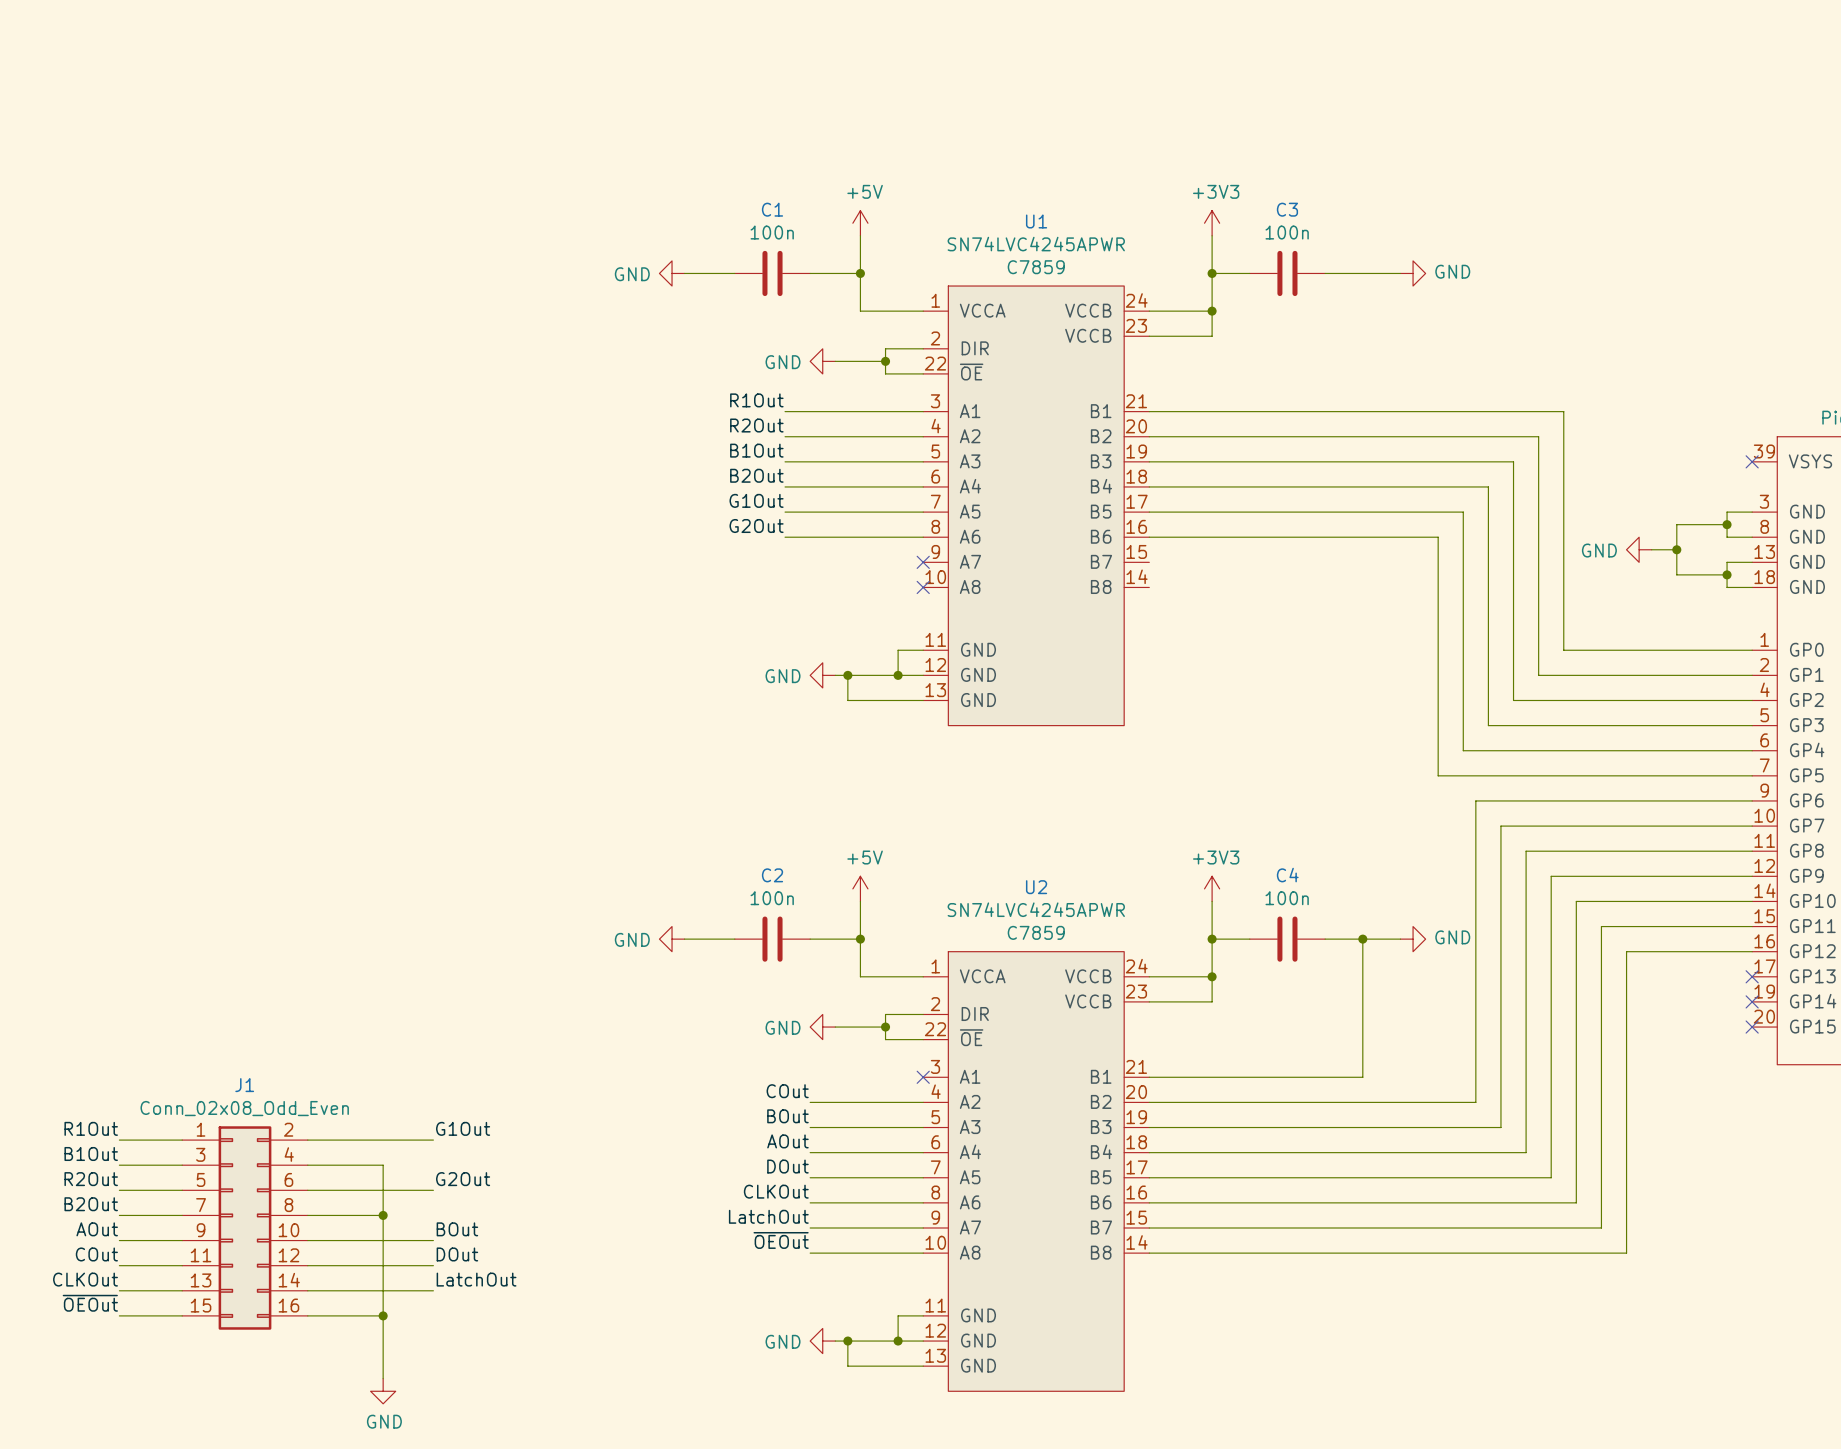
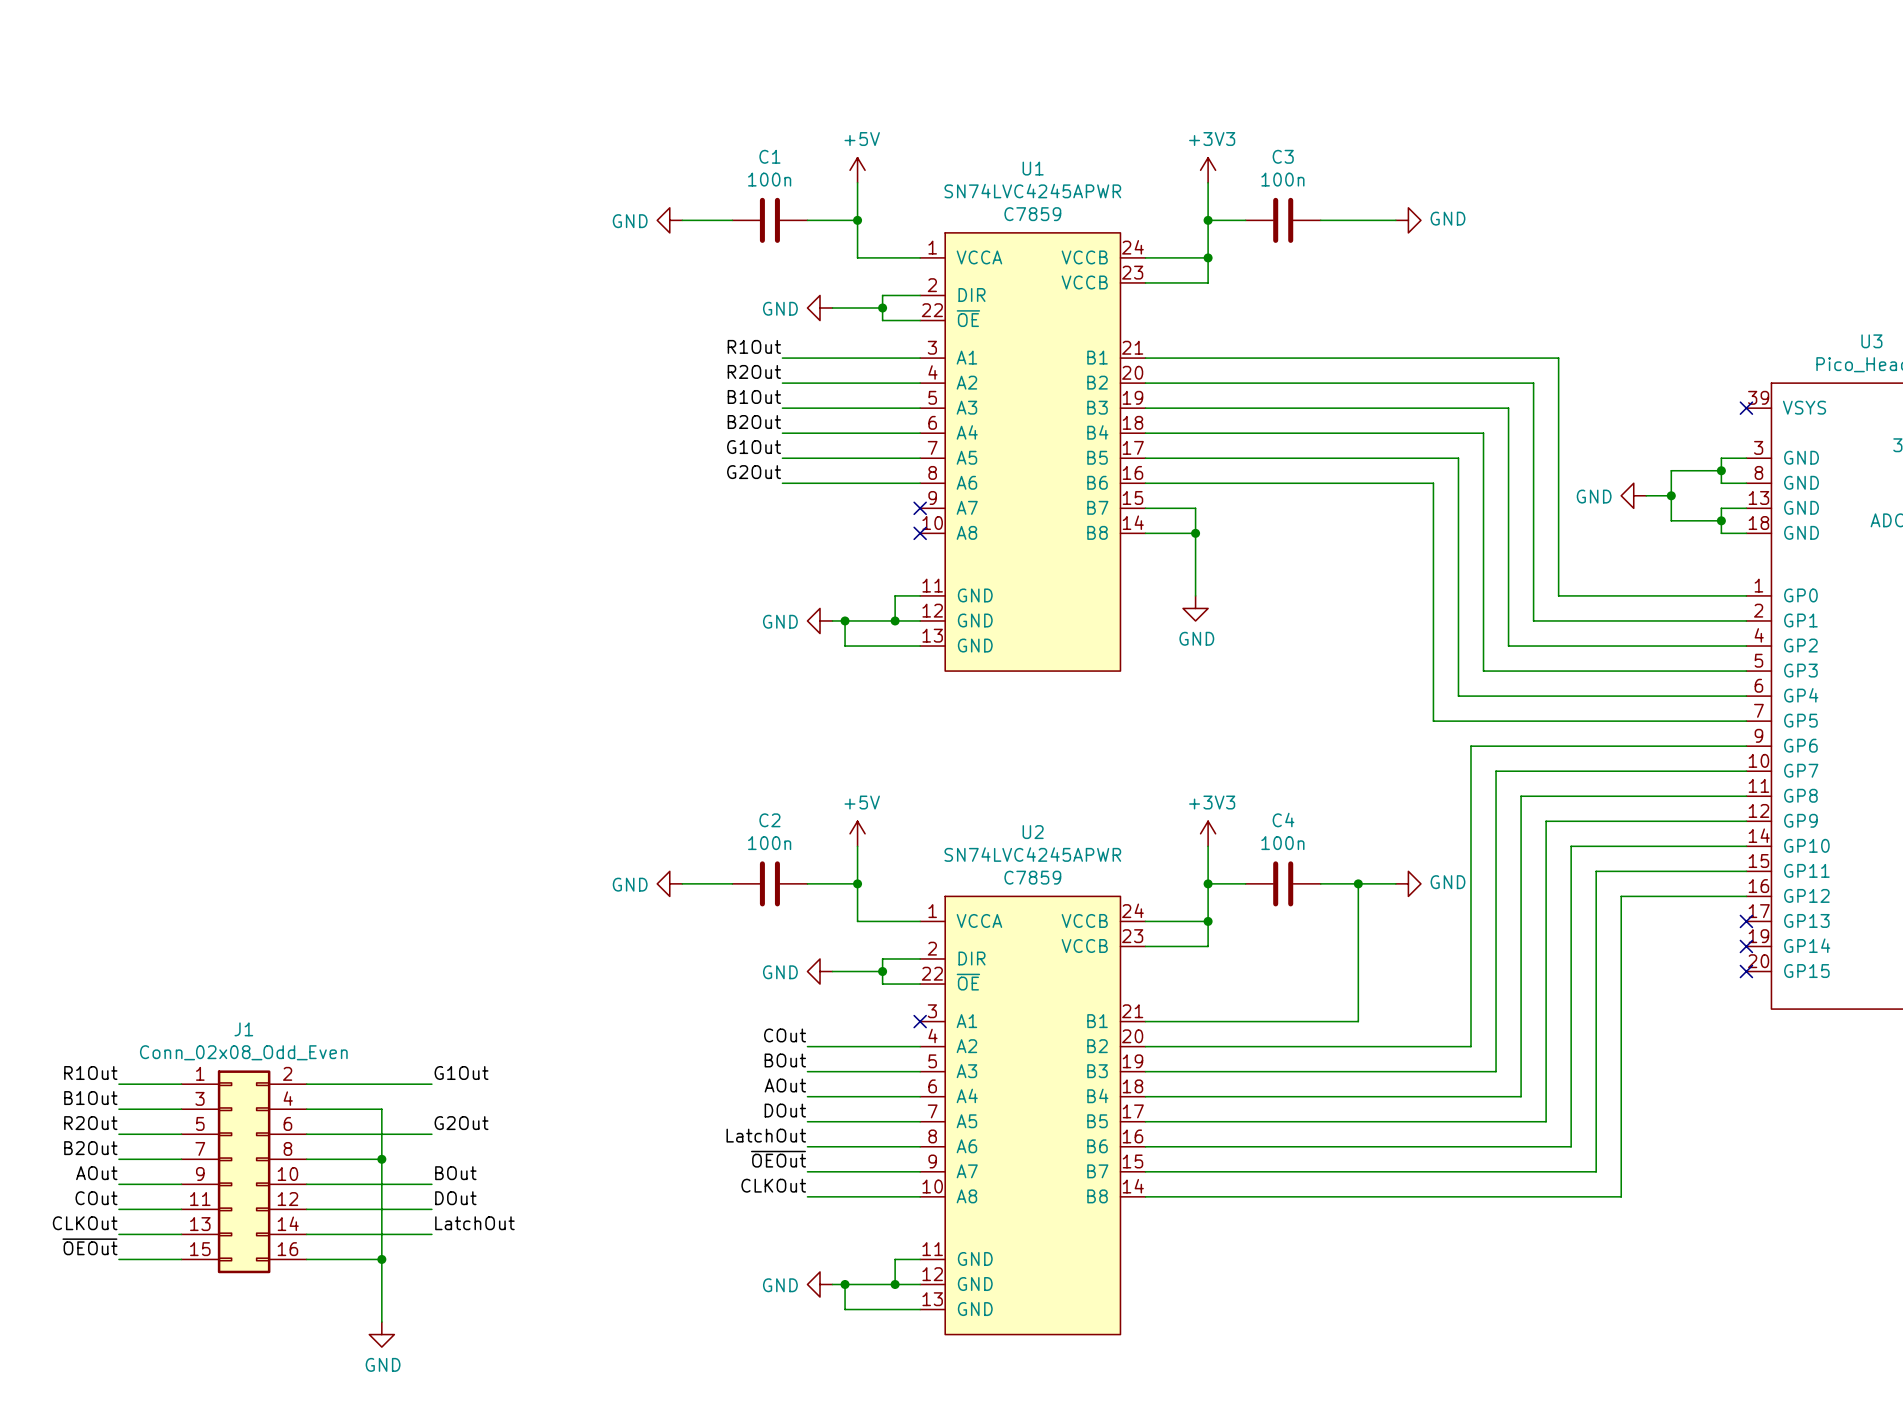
wire: none -> (1145, 508) (1195, 508) (1195, 595)
wire: none -> (1145, 533) (1195, 533)
junction: none -> (1195, 533)
power symbol: none -> GND (1195, 608)
label: CLKOut (776, 1191) -> LatchOut (766, 1135)
label: LatchOut (768, 1216) -> ~{OEOut} (778, 1159)
label: ~{OEOut} (781, 1240) -> CLKOut (773, 1185)

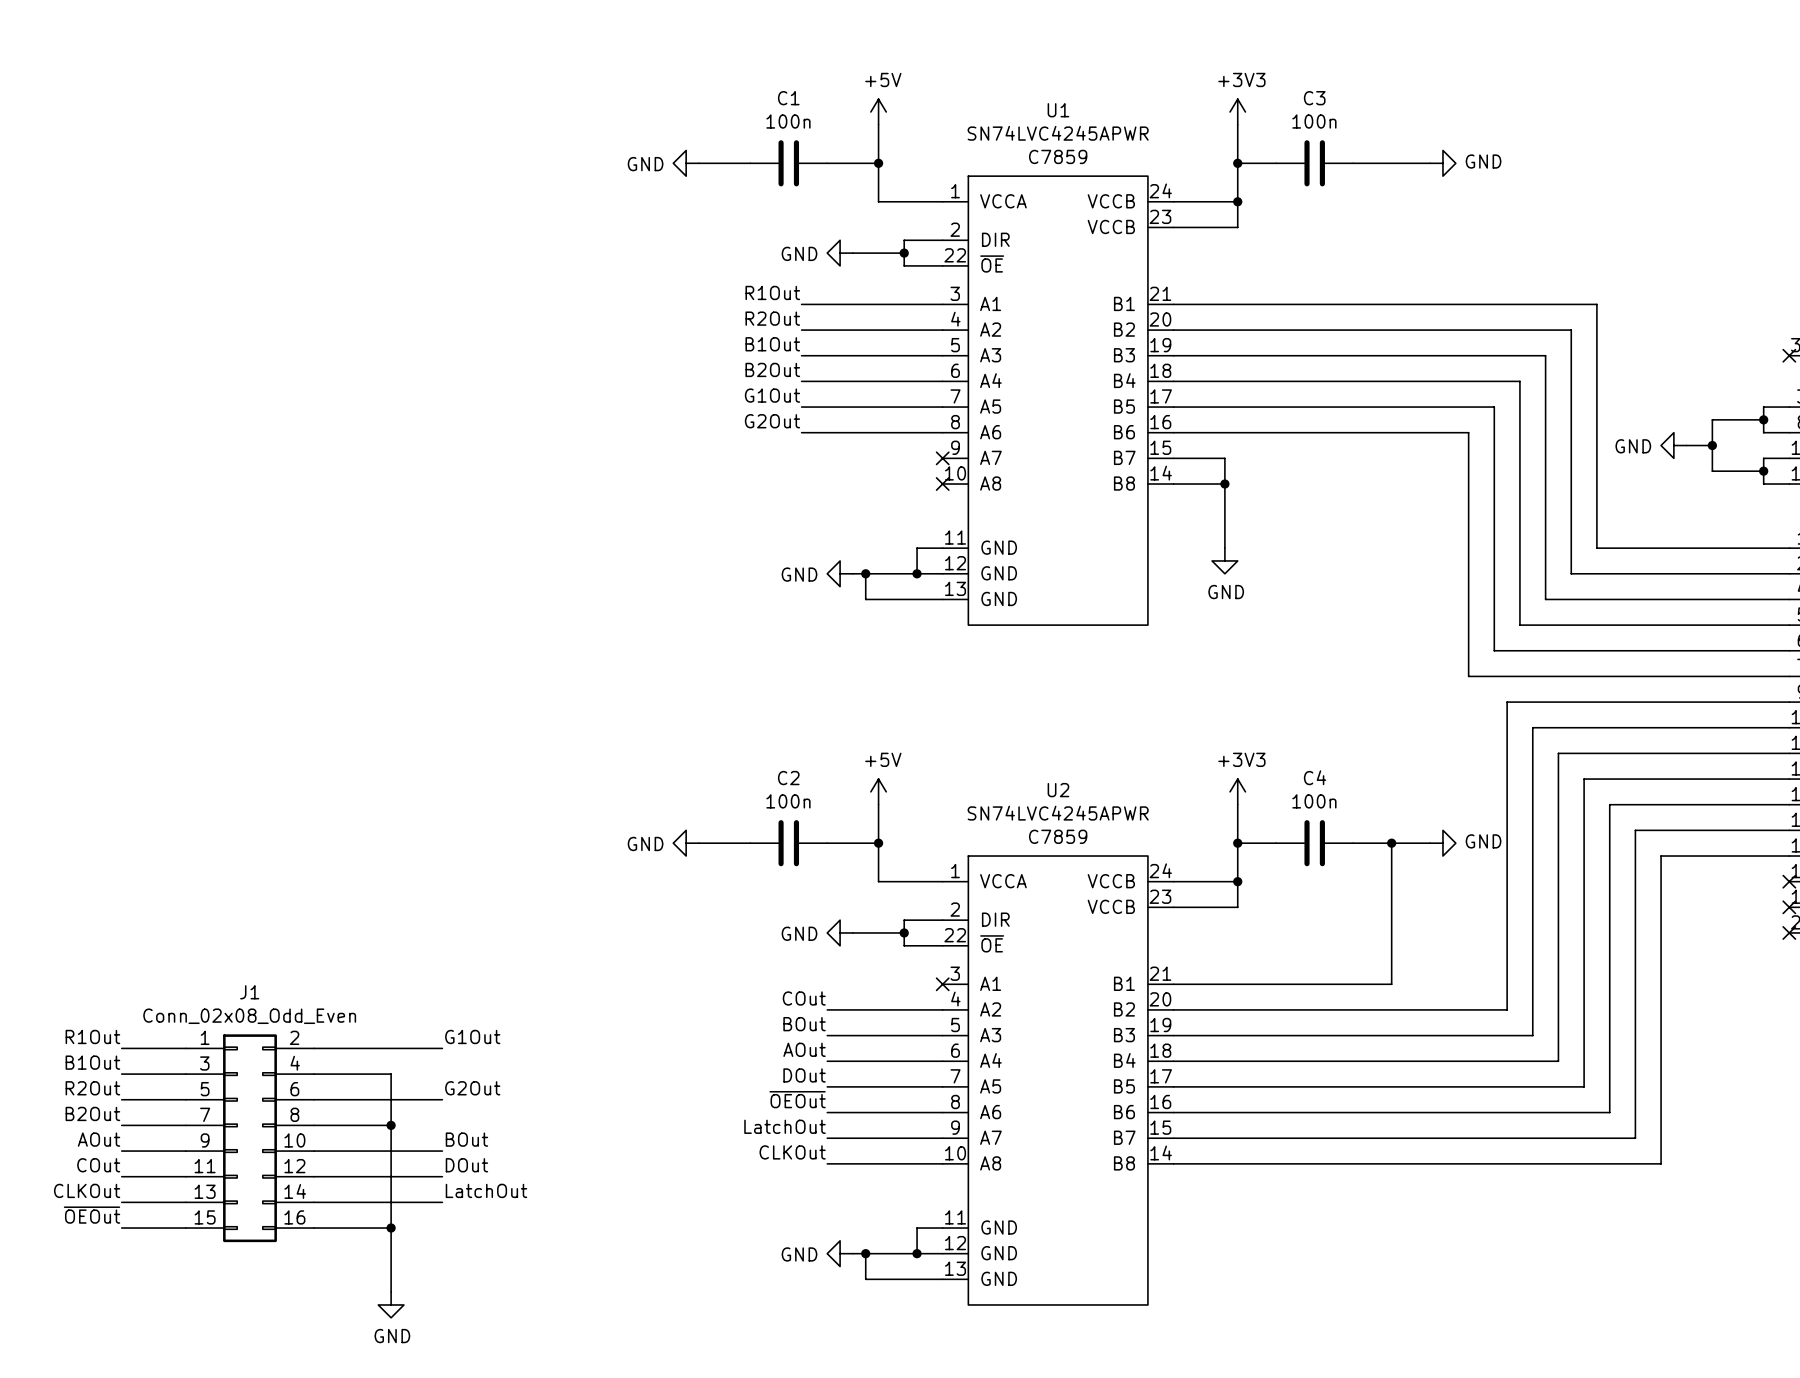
label: LatchOut (766, 1135) -> ~{OEOut} (797, 1099)
label: ~{OEOut} (778, 1159) -> LatchOut (785, 1126)

